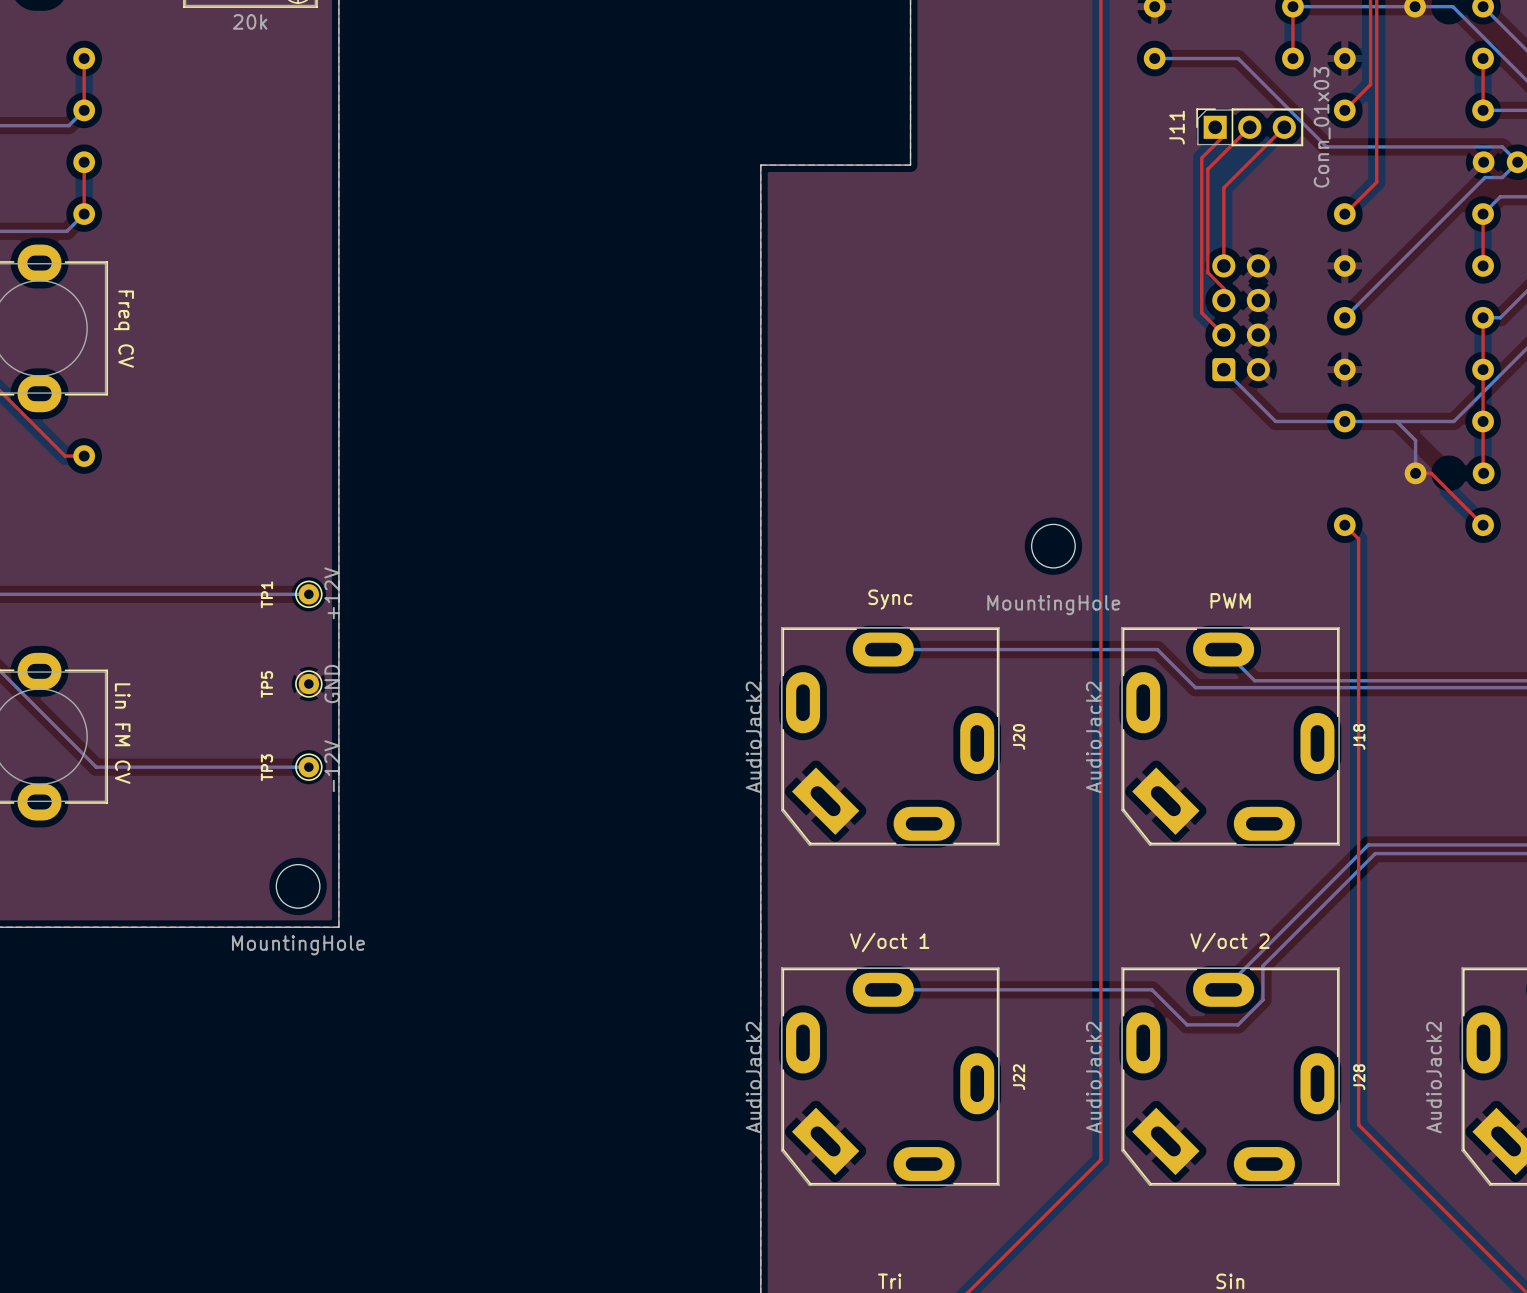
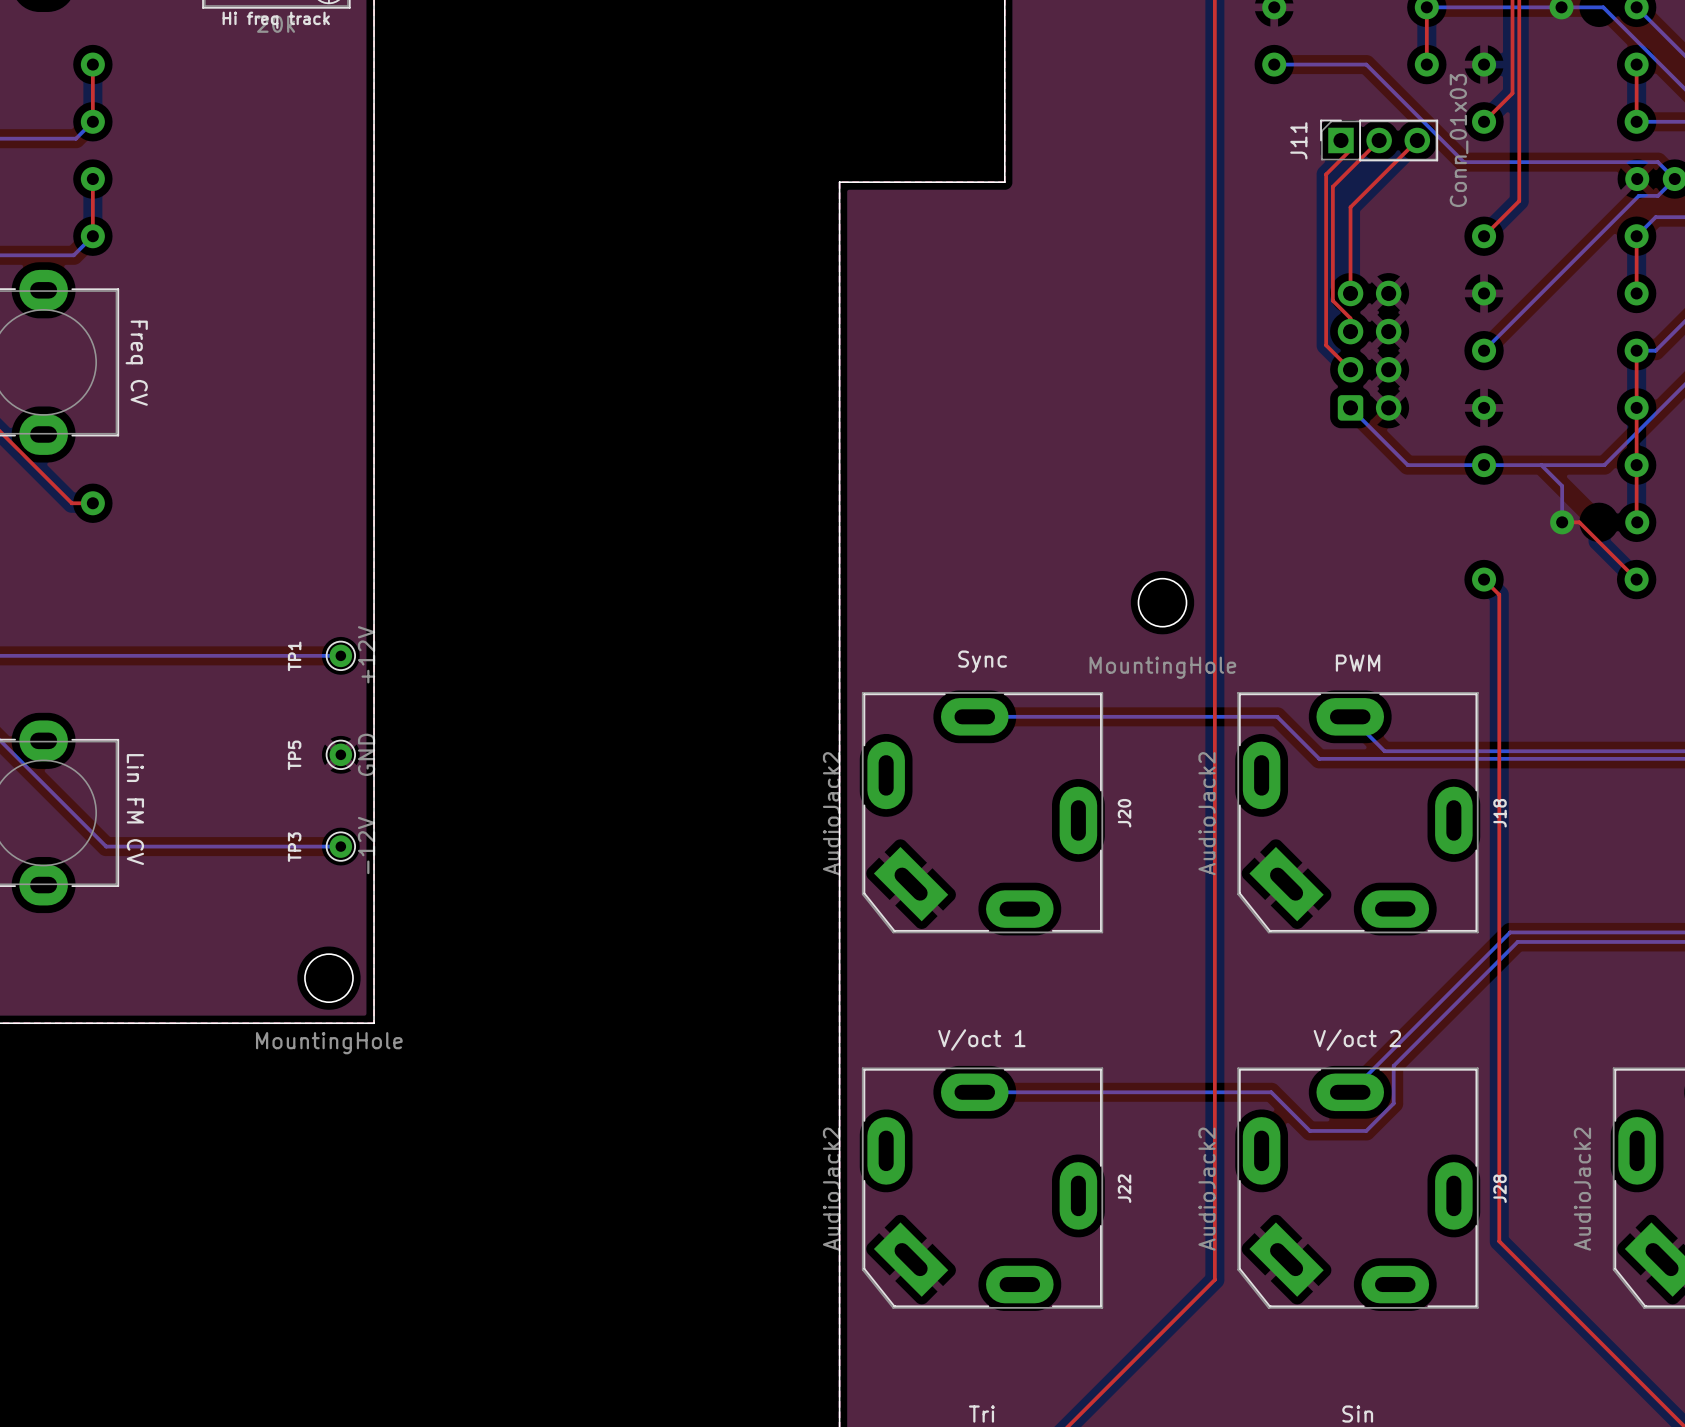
text: none -> Hi freq track (276, 20)

